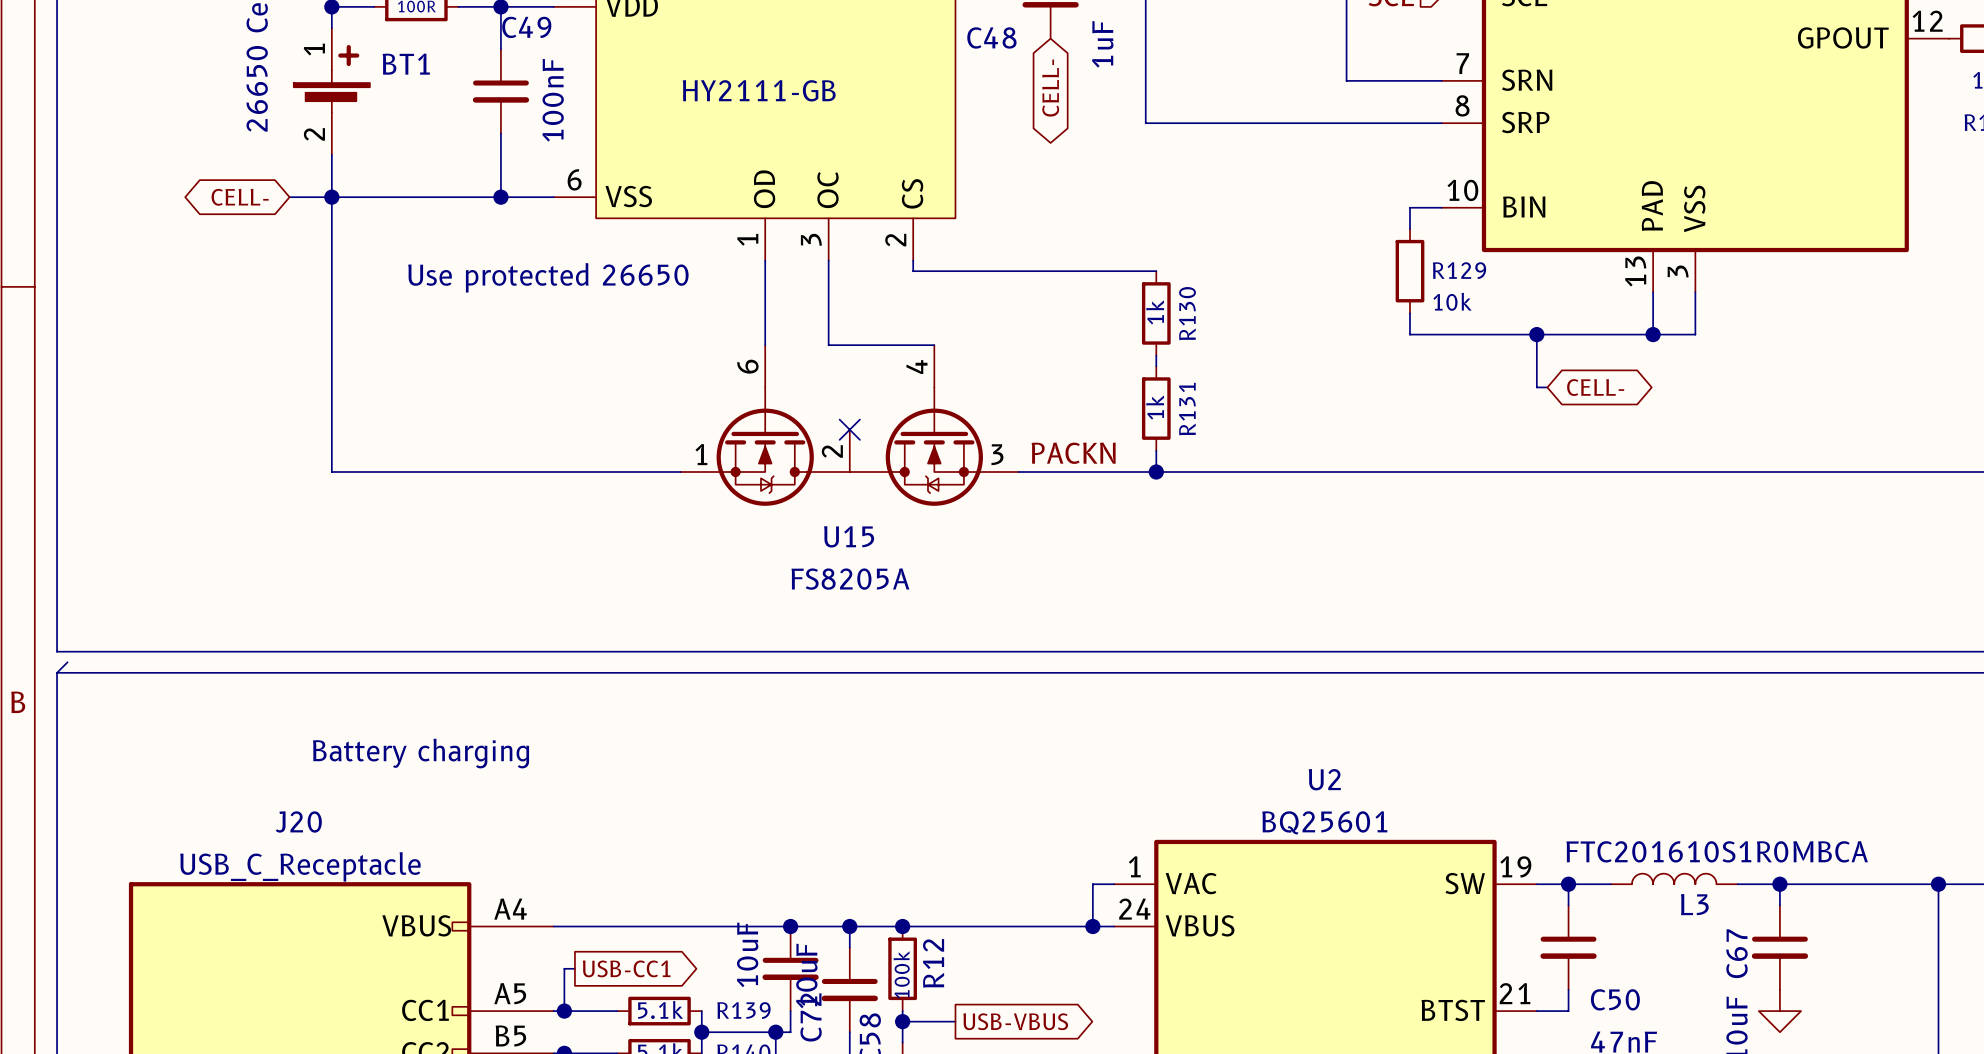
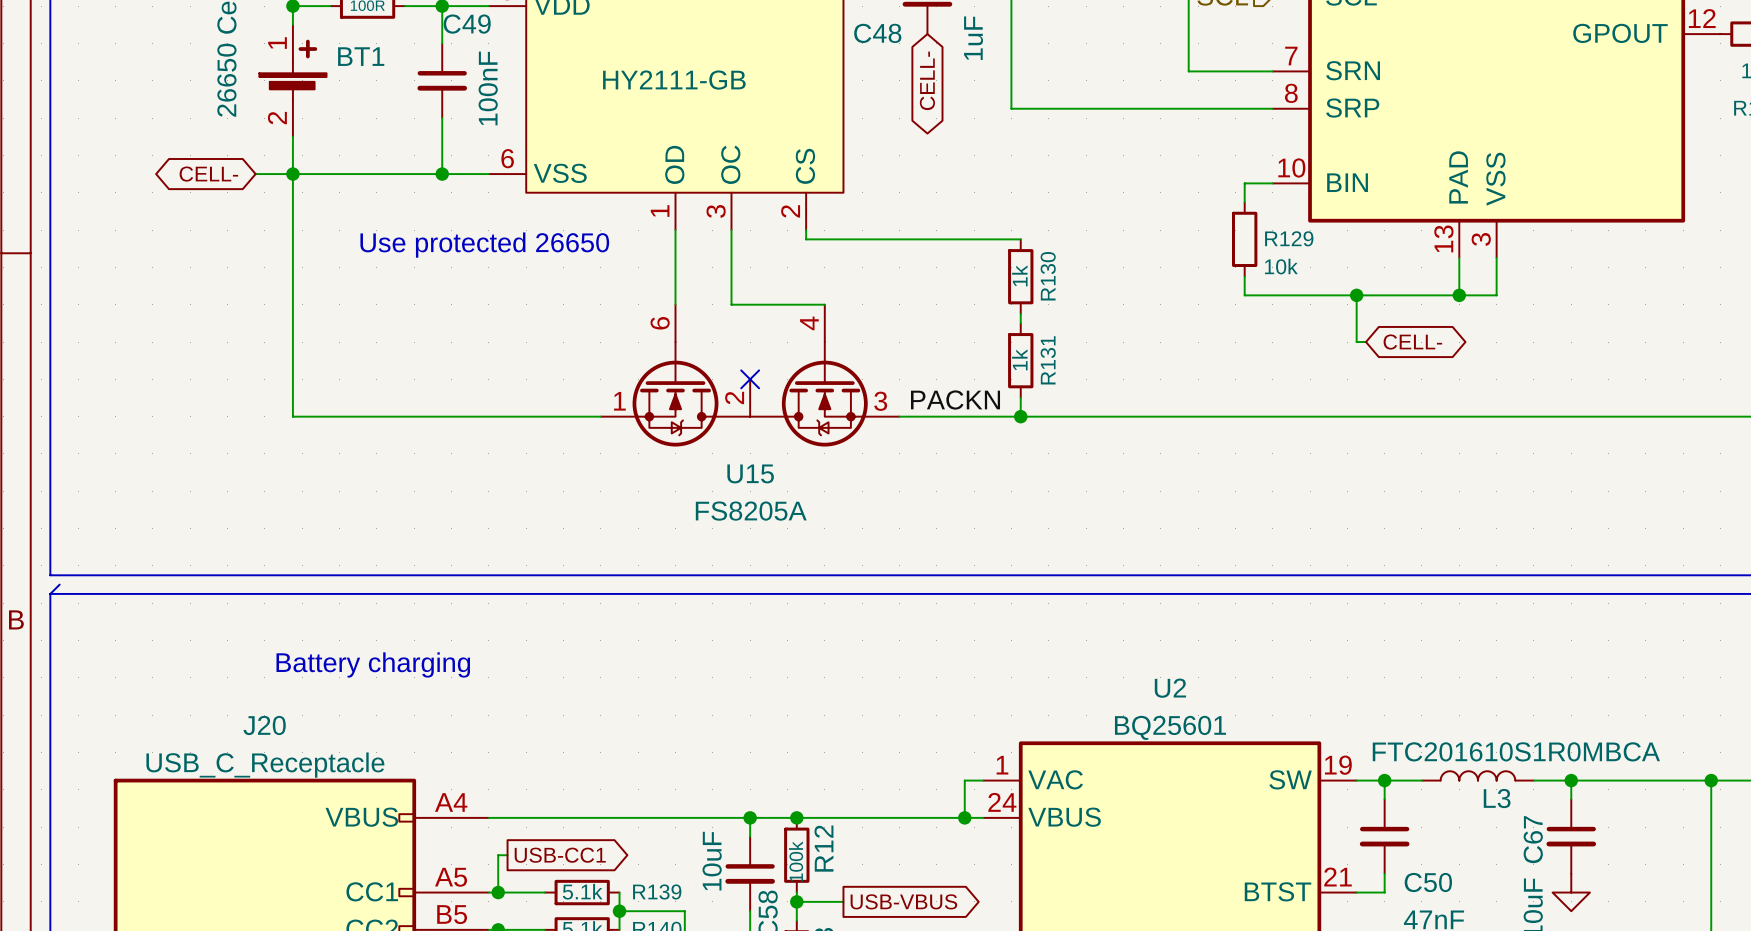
junction: (790, 926) -> none
C72: 10uF (790, 968) -> none
wire: (790, 1011) (790, 1032) (775, 1032) -> none
junction: (775, 1032) -> none

